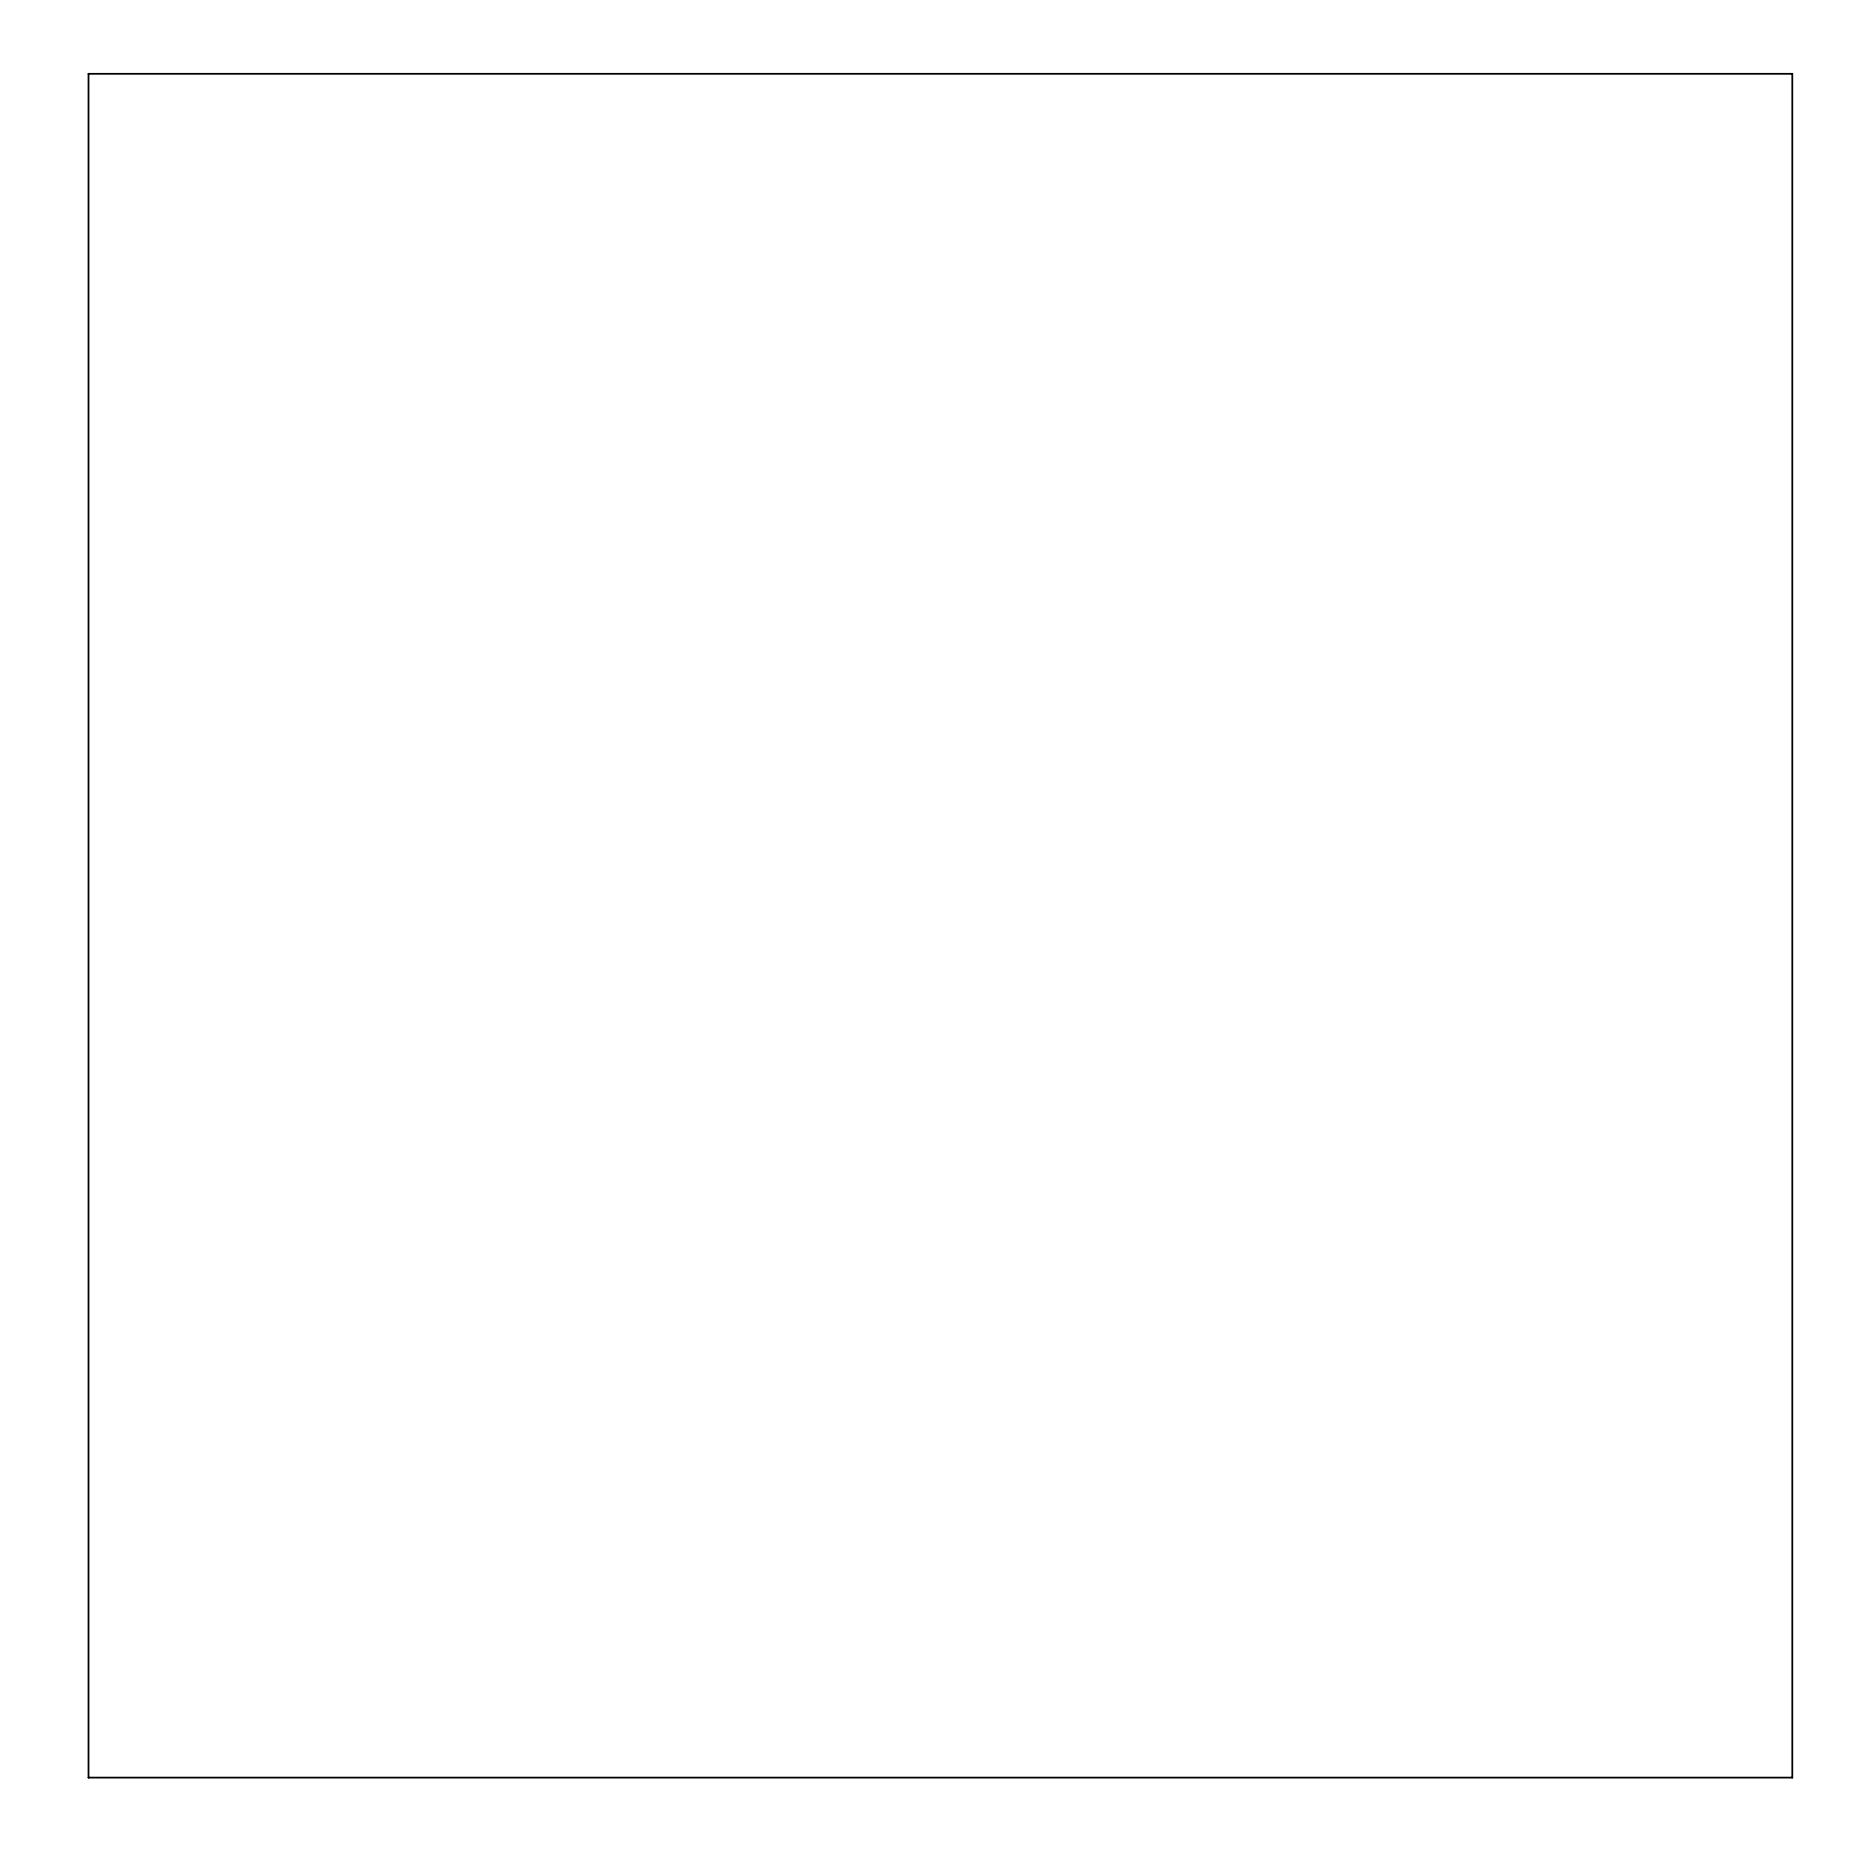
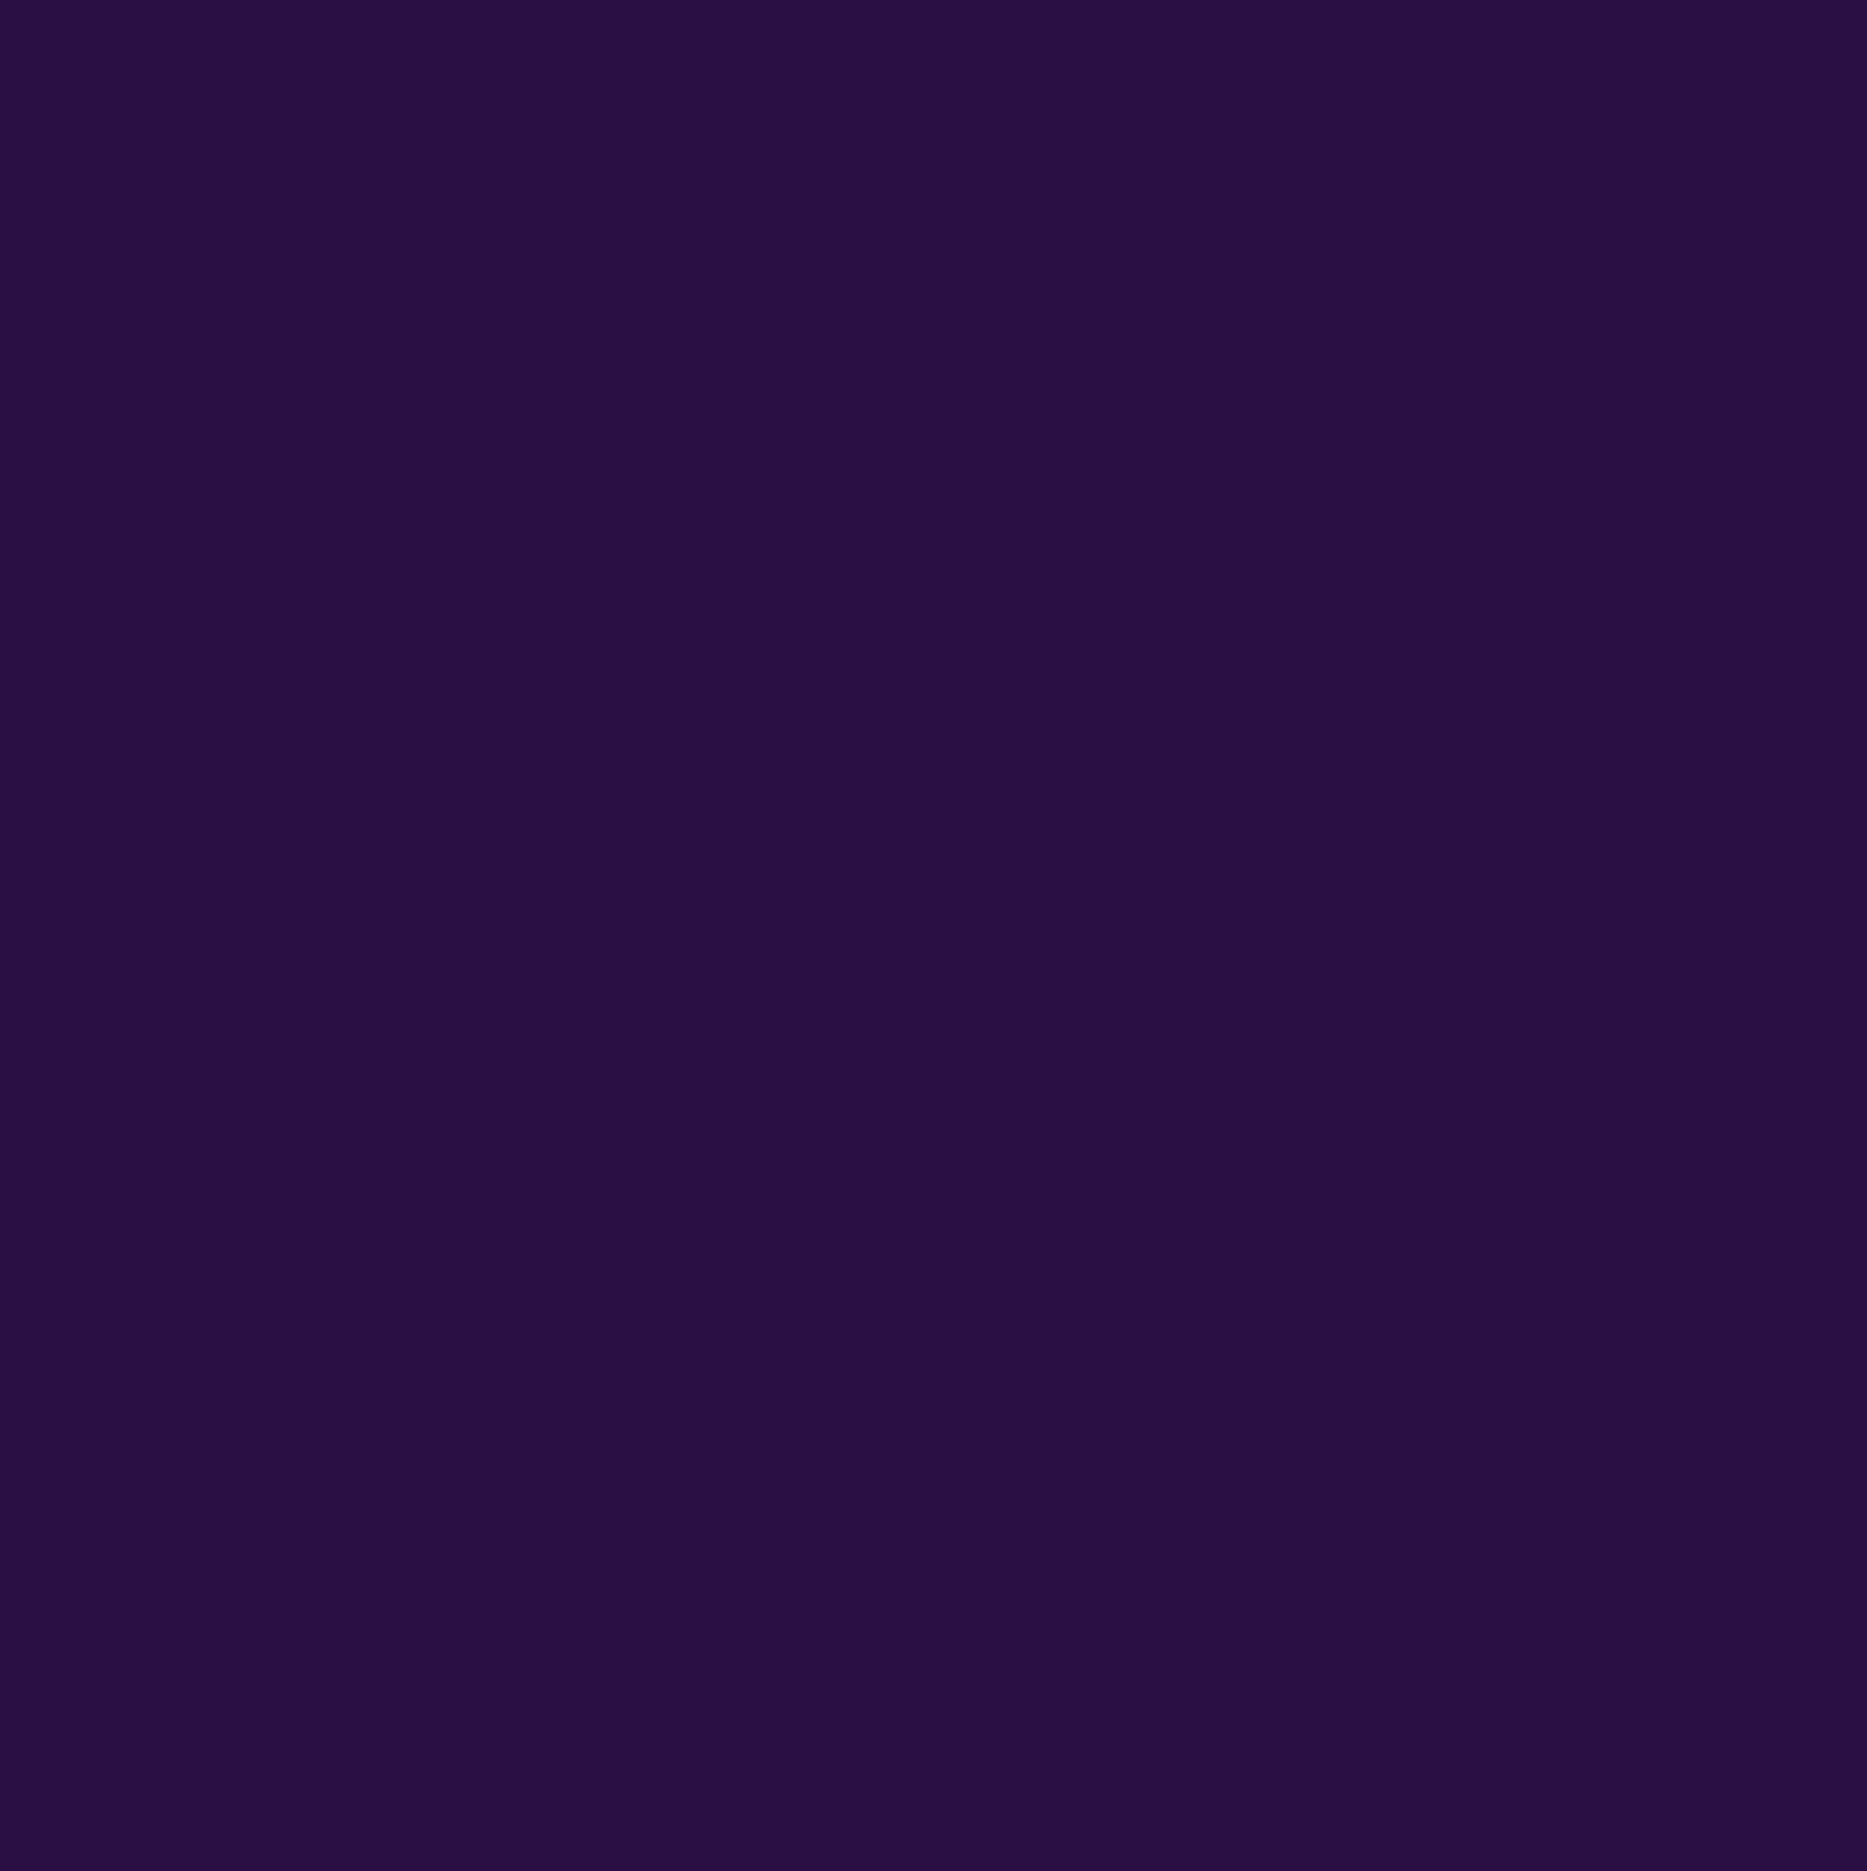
board edge: (88, 73) (88, 1777) (1792, 1777) (1792, 73) (88, 73) -> none

